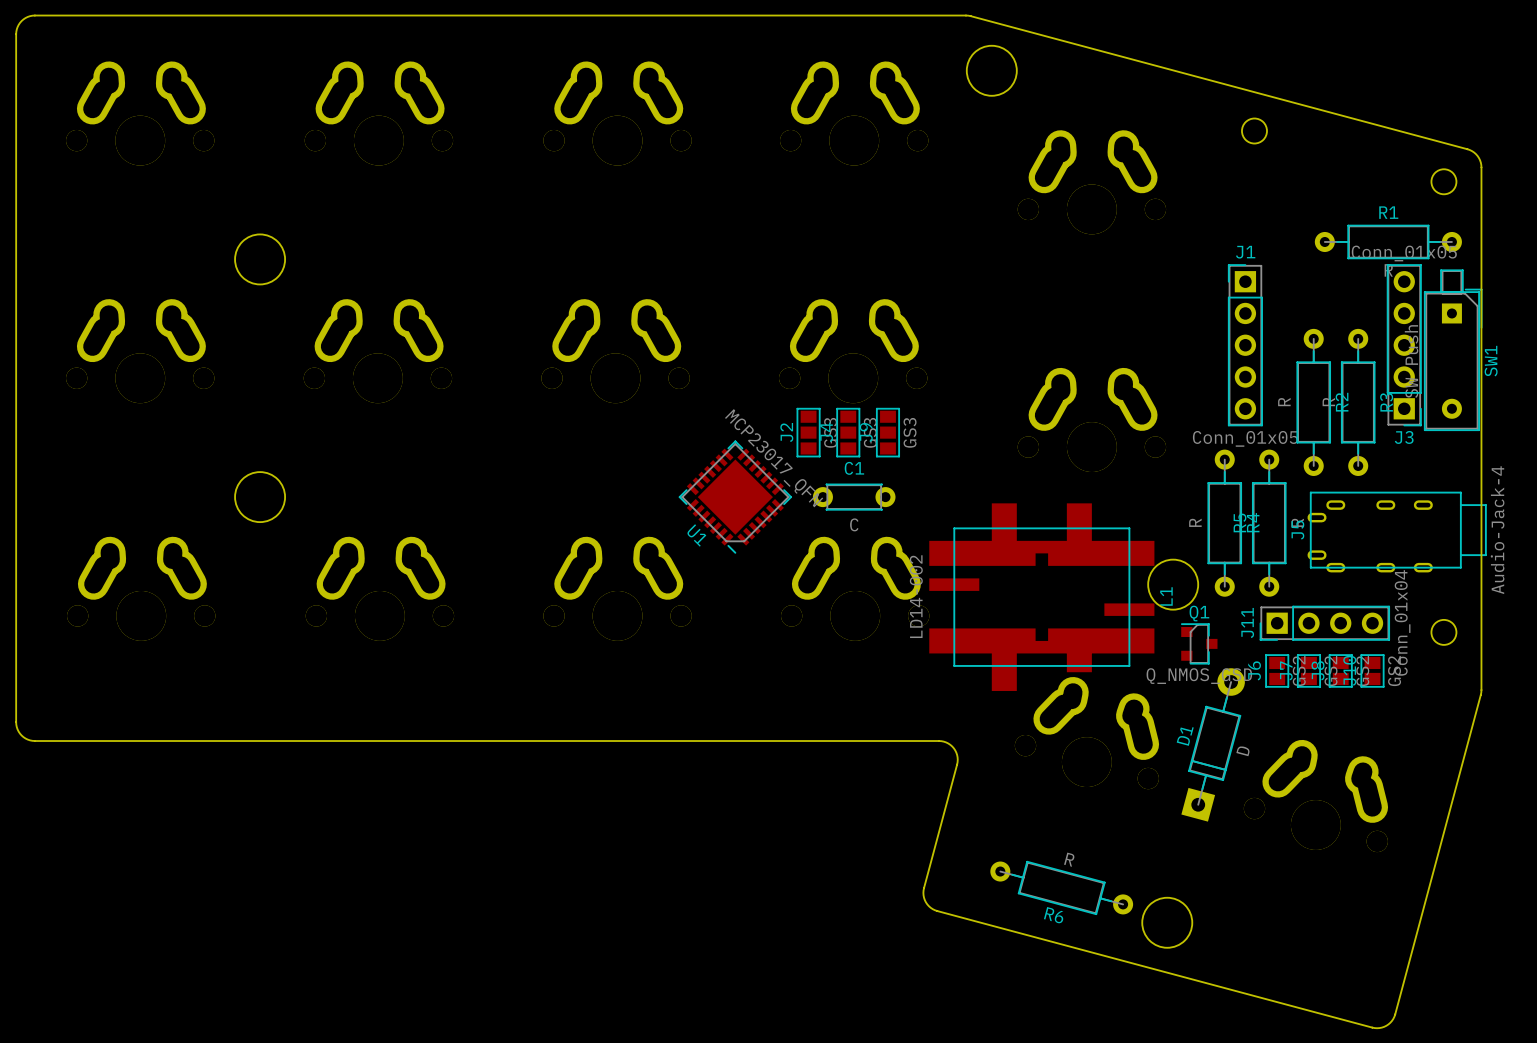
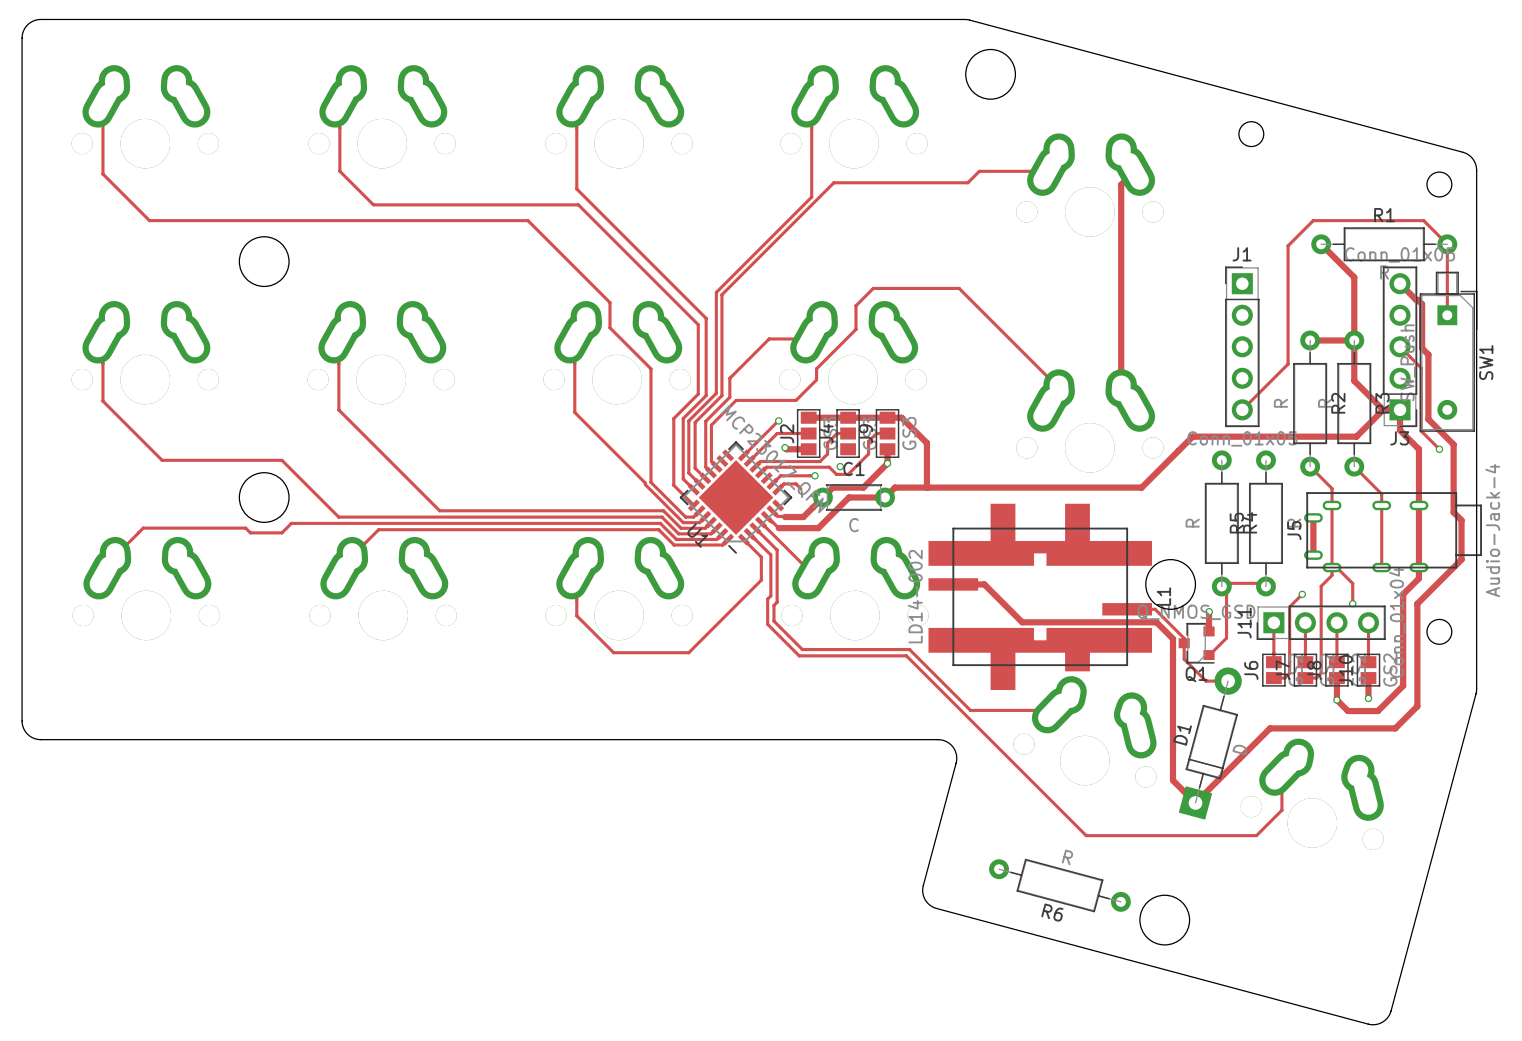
track: none -> (102, 103) (102, 174) (149, 220) (527, 220) (609, 302) (609, 327) (650, 368) (650, 482) (685, 517) (693, 517) (699, 511)
track: none -> (339, 103) (339, 171) (373, 204) (578, 204) (698, 324) (698, 394) (673, 418) (673, 485) (693, 505)
track: none -> (576, 103) (576, 189) (706, 318) (706, 395) (683, 418) (683, 478) (693, 489)
track: none -> (811, 103) (811, 197) (716, 292) (716, 393) (688, 420) (688, 473) (699, 483)
track: none -> (1047, 171) (979, 171) (967, 182) (833, 182) (721, 294) (721, 395) (695, 422) (695, 468) (699, 472)
track: none -> (1134, 171) (1121, 184) (1121, 388)
track: none -> (1321, 244) (1354, 277) (1354, 380) (1383, 409)
track: none -> (1400, 283) (1422, 304) (1422, 348) (1428, 354) (1428, 419) (1453, 444) (1453, 512) (1461, 520) (1461, 559) (1417, 603) (1417, 706) (1395, 728) (1270, 728) (1195, 802) (1173, 780) (1173, 638) (1156, 622) (1022, 622) (984, 584) (953, 584)
track: none -> (1447, 315) (1447, 244) (1423, 220) (1313, 220) (1288, 245) (1288, 364) (1242, 409)
track: none -> (102, 338) (102, 401) (162, 460) (281, 460) (338, 517) (661, 517) (678, 533) (711, 533) (716, 528)
track: none -> (338, 338) (338, 410) (439, 510) (663, 510) (681, 528) (705, 528) (710, 522)
track: none -> (574, 338) (574, 412) (683, 522) (699, 522) (705, 516)
track: none -> (810, 338) (769, 338) (729, 378) (729, 397) (705, 421) (705, 467) (710, 472)
track: none -> (1310, 340) (1354, 340)
track: none -> (1400, 346) (1421, 368) (1421, 431) (1439, 449)
track: none -> (1059, 388) (959, 288) (873, 288) (855, 305) (855, 329) (816, 368) (816, 379) (796, 400) (736, 400) (711, 425) (711, 461) (716, 466)
track: none -> (1383, 409) (1356, 436) (1192, 436) (1141, 487) (894, 487) (885, 497) (848, 497) (818, 528) (778, 528) (766, 516)
track: none -> (1383, 409) (1400, 409) (1400, 430) (1418, 449) (1418, 578) (1403, 594) (1403, 685) (1377, 711) (1347, 711) (1336, 700) (1336, 678)
track: none -> (808, 417) (901, 417) (926, 443) (926, 487)
track: none -> (778, 420) (743, 455)
via: none -> (778, 420)
track: none -> (808, 433) (777, 433) (749, 461)
track: none -> (848, 433) (837, 433) (827, 442) (827, 454) (820, 461) (760, 461) (755, 466)
track: none -> (887, 433) (876, 433) (868, 441) (868, 454) (848, 474) (836, 474) (829, 467) (766, 467) (761, 472)
track: none -> (785, 447) (808, 449)
via: none -> (785, 447)
track: none -> (887, 449) (887, 463) (863, 487) (832, 487) (803, 517) (777, 516) (772, 511)
via: none -> (1439, 449)
via: none -> (887, 463)
via: none -> (840, 466)
track: none -> (1310, 466) (1332, 488) (1332, 575) (1321, 586) (1321, 673) (1316, 678) (1305, 678)
track: none -> (1354, 466) (1381, 494) (1381, 567)
track: none -> (814, 475) (780, 475) (772, 483)
via: none -> (814, 475)
track: none -> (800, 488) (796, 483) (783, 483) (778, 489)
track: none -> (1313, 517) (1313, 555)
track: none -> (761, 522) (812, 574)
track: none -> (755, 528) (777, 550) (777, 602) (773, 605) (773, 621) (802, 649) (909, 649) (970, 710) (1054, 710)
track: none -> (138, 532) (143, 528) (245, 528) (250, 532) (281, 532) (291, 523) (660, 523) (676, 539) (716, 539) (722, 533)
track: none -> (138, 532) (115, 556)
track: none -> (728, 539) (722, 545) (674, 545) (658, 529) (378, 529) (352, 556)
track: none -> (743, 539) (761, 557) (761, 580) (688, 652) (613, 652) (576, 615) (576, 574)
track: none -> (755, 539) (770, 554) (770, 595) (767, 599) (767, 624) (799, 655) (906, 655) (1086, 835) (1256, 835) (1281, 810) (1281, 772)
track: none -> (1332, 567) (1336, 567) (1352, 583) (1352, 603)
track: none -> (1273, 583) (1226, 583) (1226, 638) (1209, 655)
track: none -> (1302, 594) (1289, 606) (1289, 673) (1284, 678) (1273, 678)
via: none -> (1302, 594)
via: none -> (1352, 603)
track: none -> (1127, 609) (1155, 609) (1184, 638) (1184, 659) (1206, 681) (1228, 681)
track: none -> (1209, 611) (1209, 631)
via: none -> (1209, 611)
track: none -> (1273, 622) (1273, 662)
track: none -> (1305, 622) (1305, 662)
track: none -> (1336, 622) (1336, 662)
track: none -> (1368, 622) (1368, 662)
Q1 rotation: 0° (1199, 643) -> 180° (1196, 643)
track: none -> (1368, 678) (1368, 698)
via: none -> (1368, 698)
via: none -> (1336, 700)

